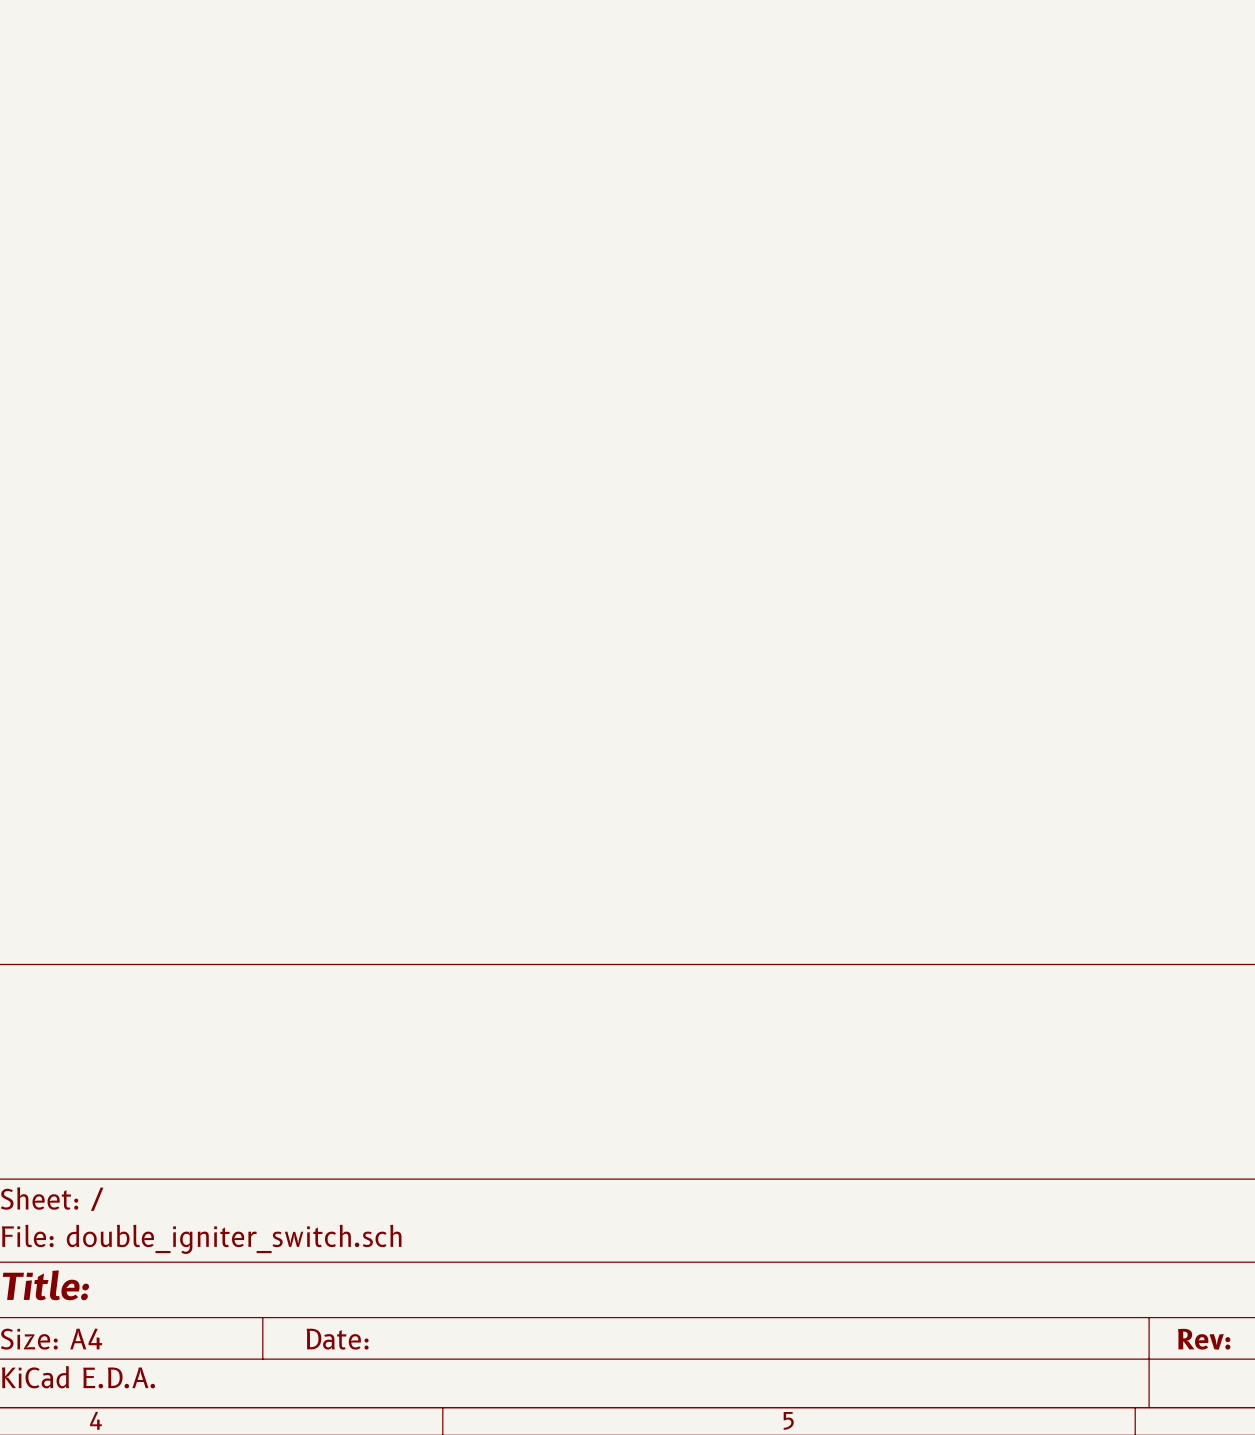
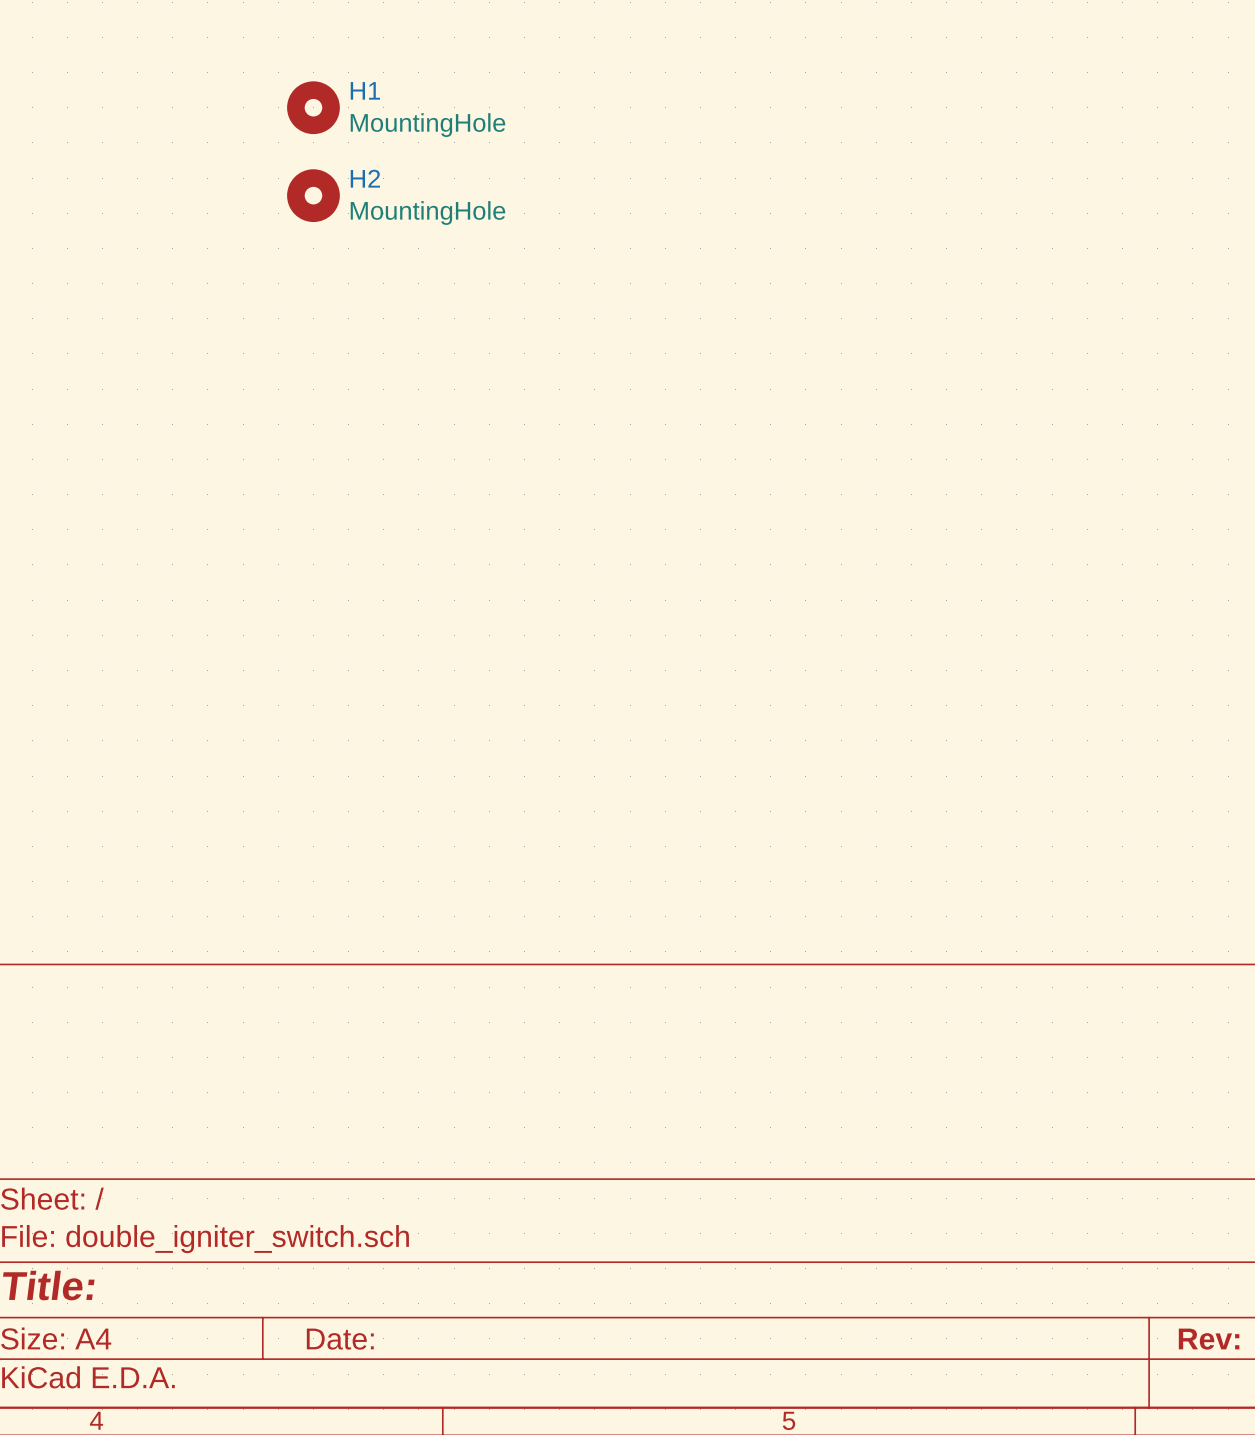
H1: none -> MountingHole (313, 107)
H2: none -> MountingHole (313, 195)

